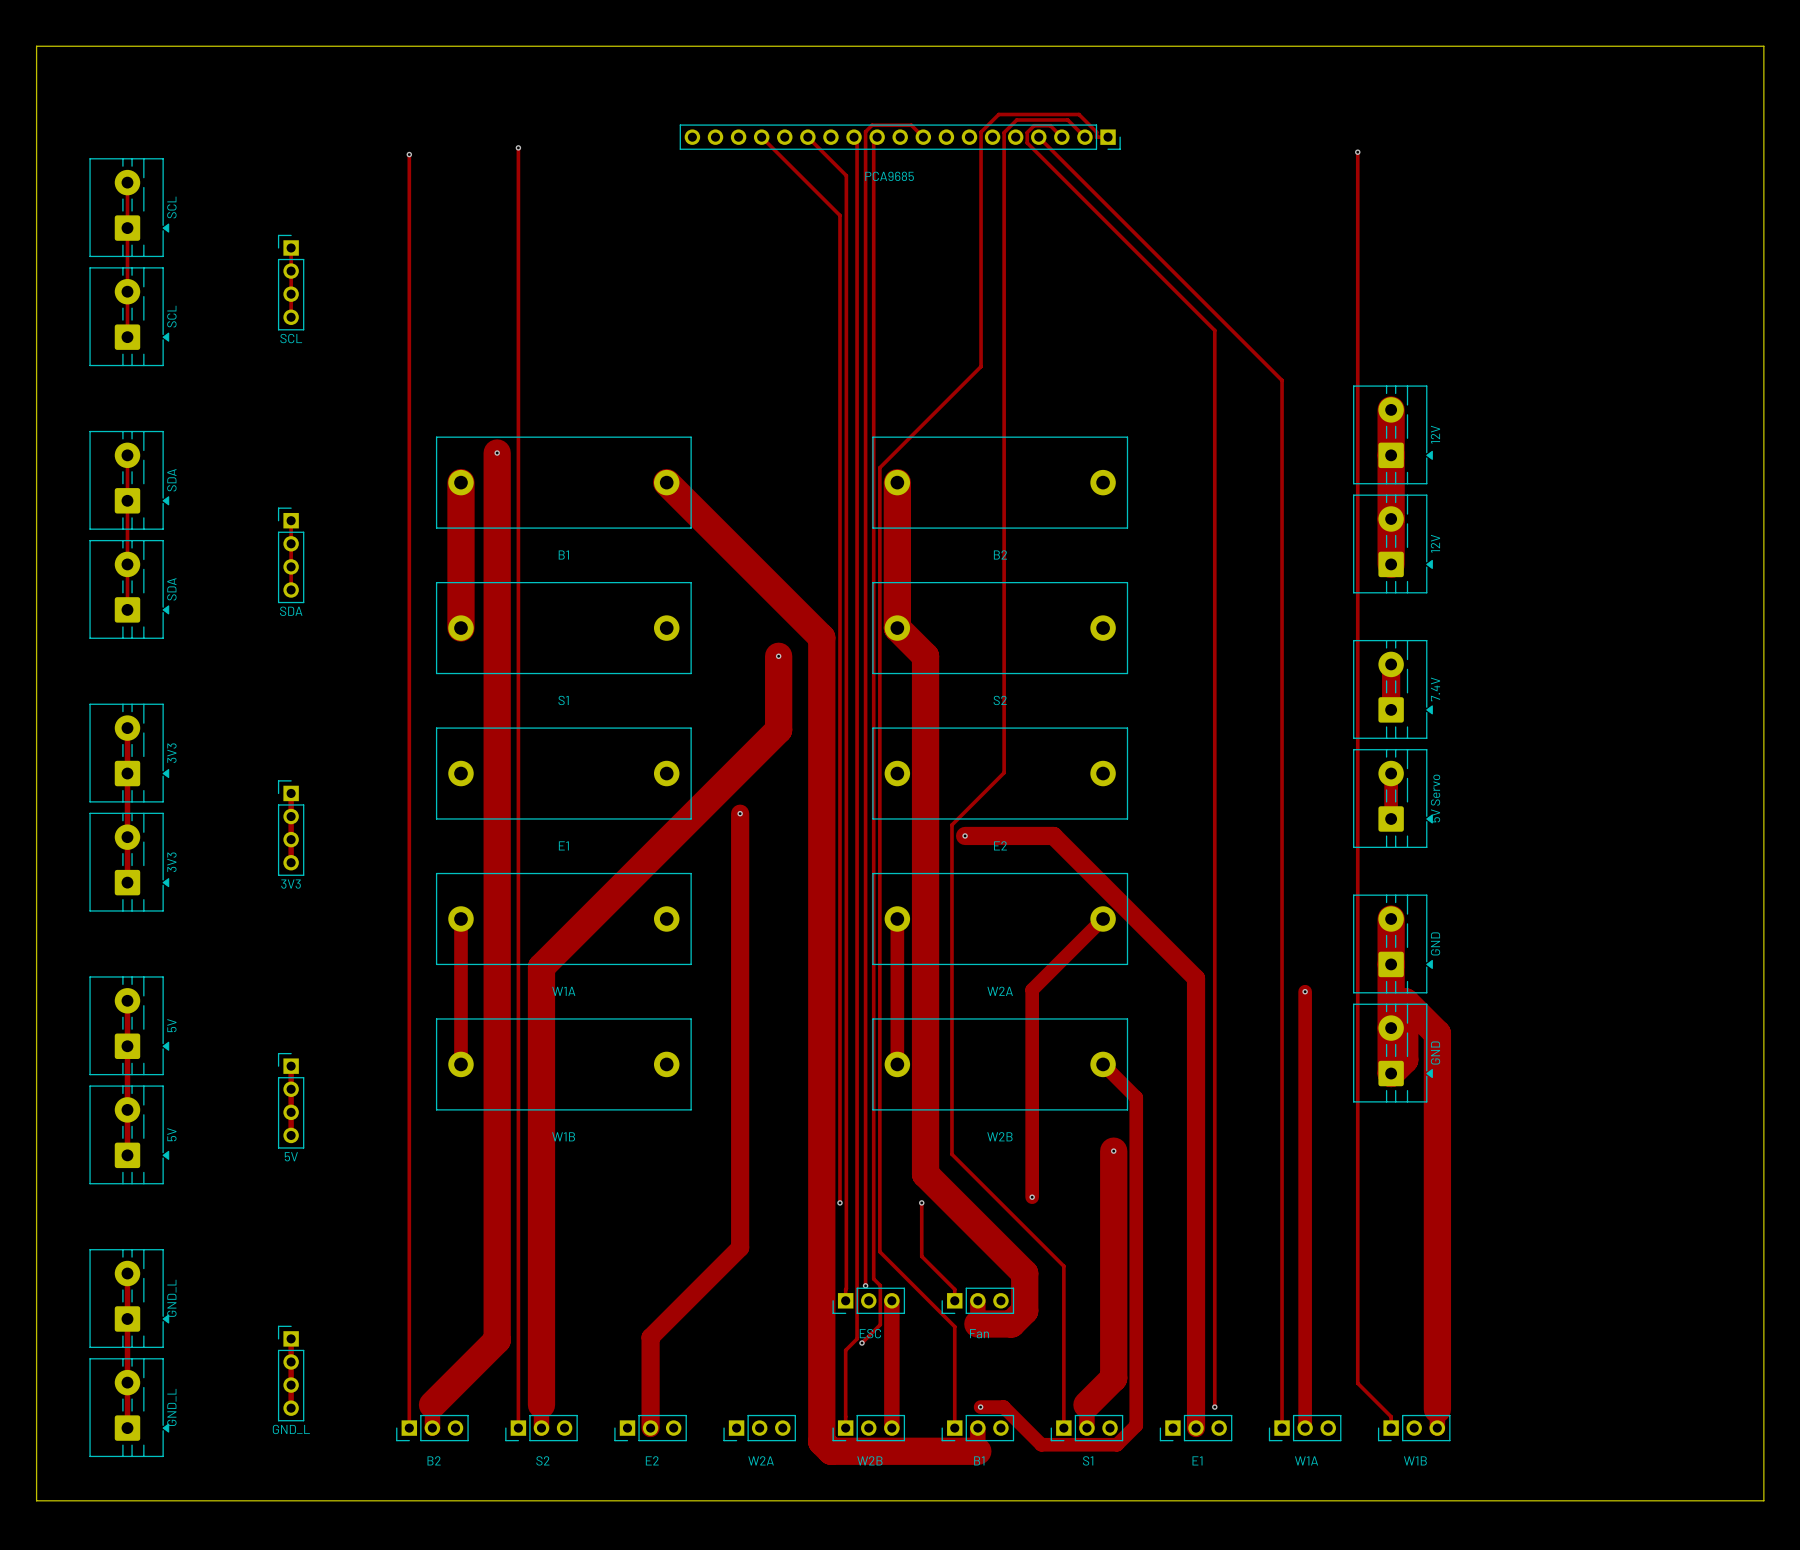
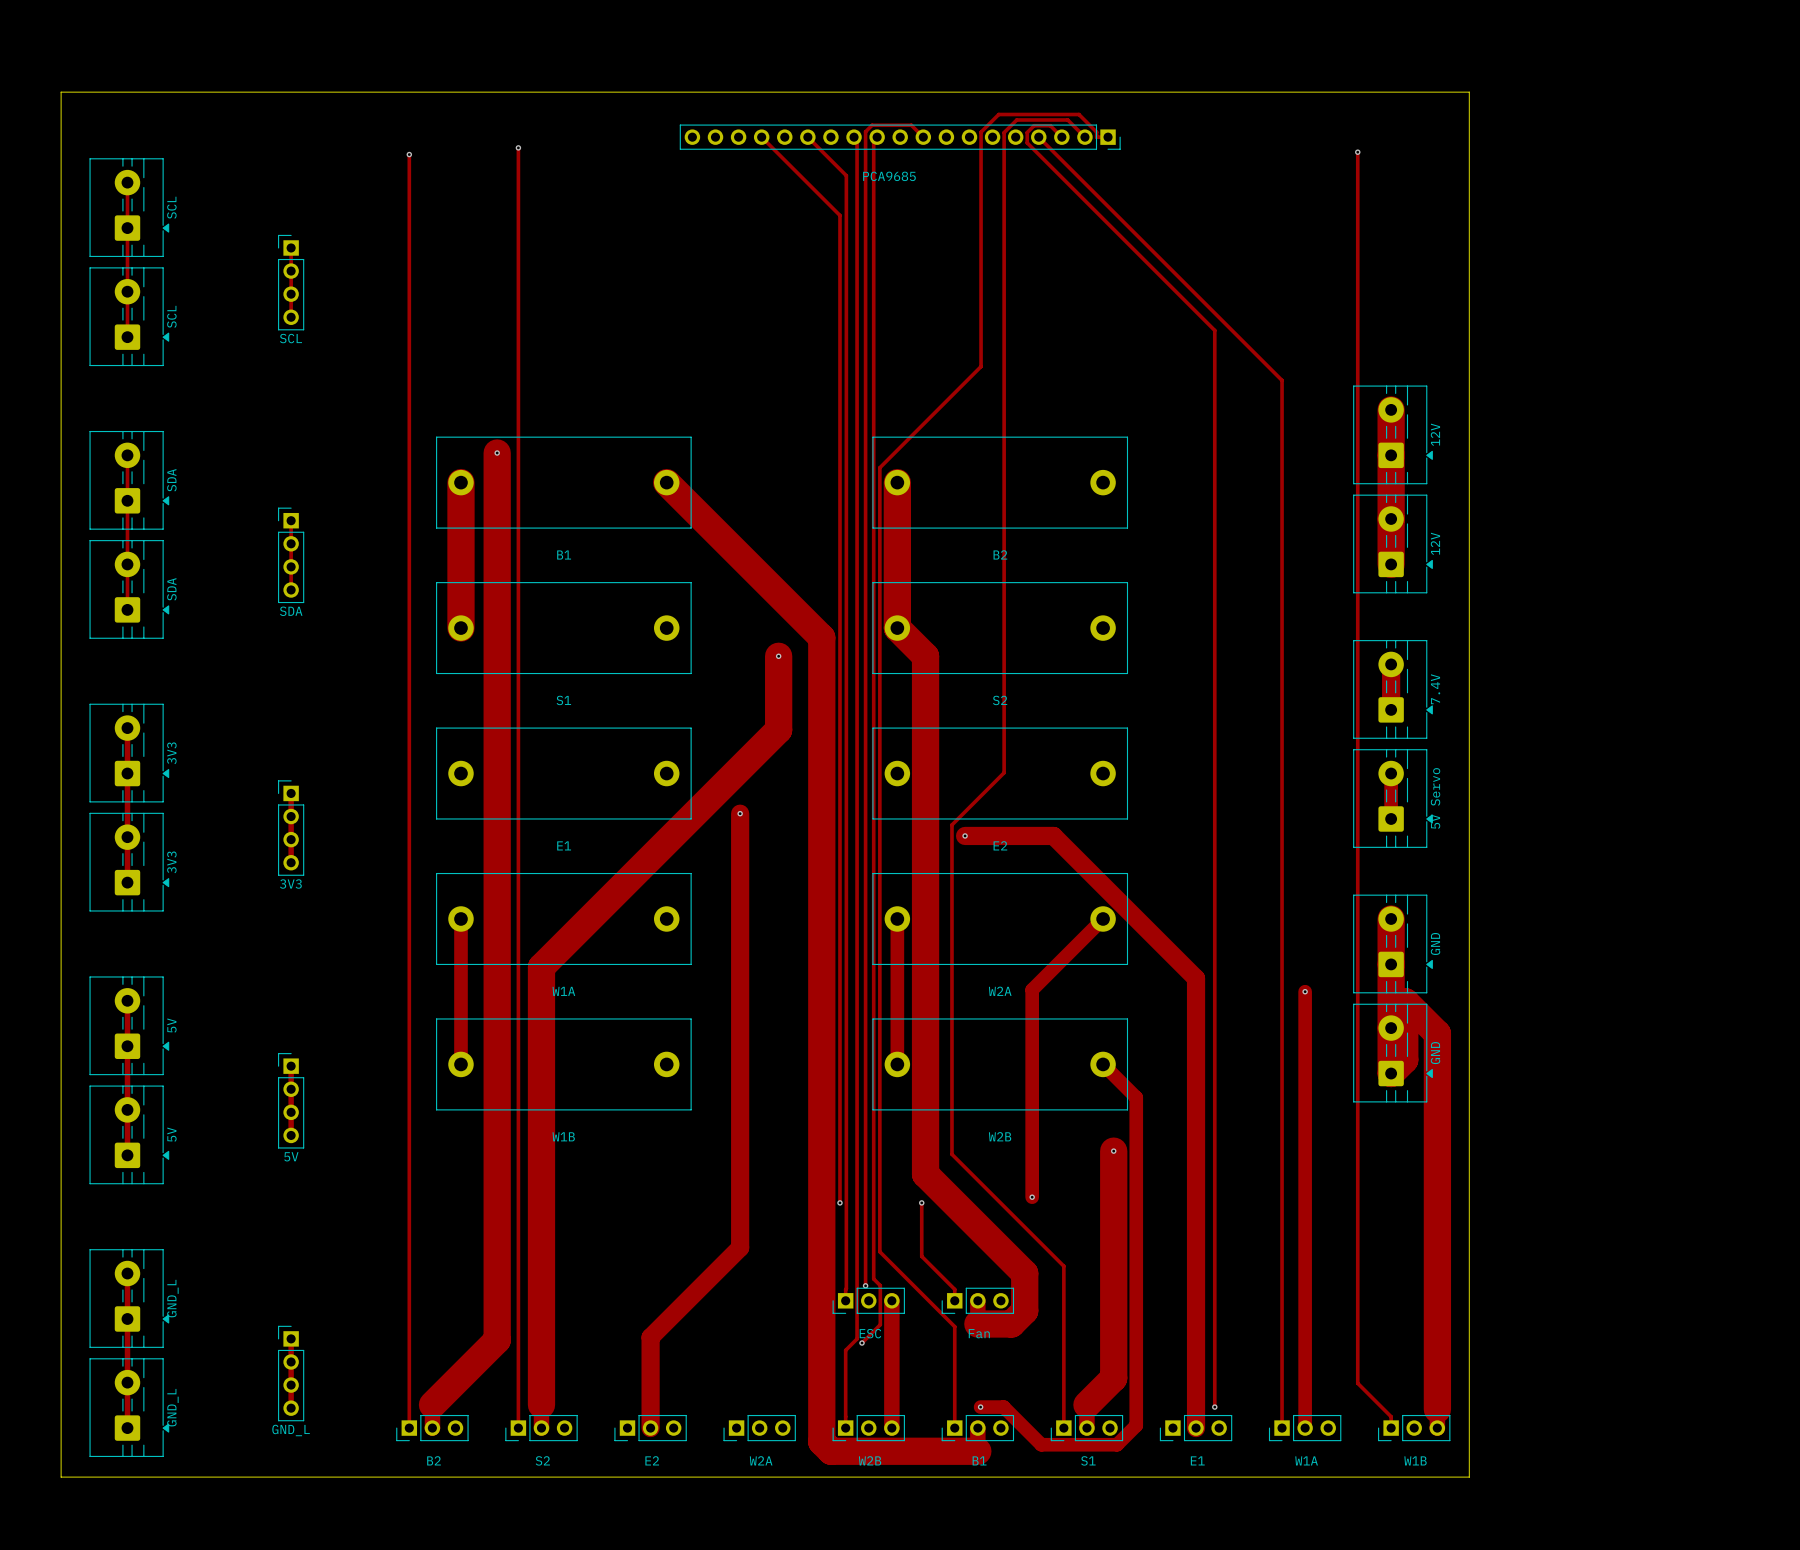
board edge: (36, 46) (1763, 46) (1763, 1500) (36, 1500) (36, 46) -> (61, 92) (61, 1477) (1469, 1477) (1469, 92) (61, 92)

